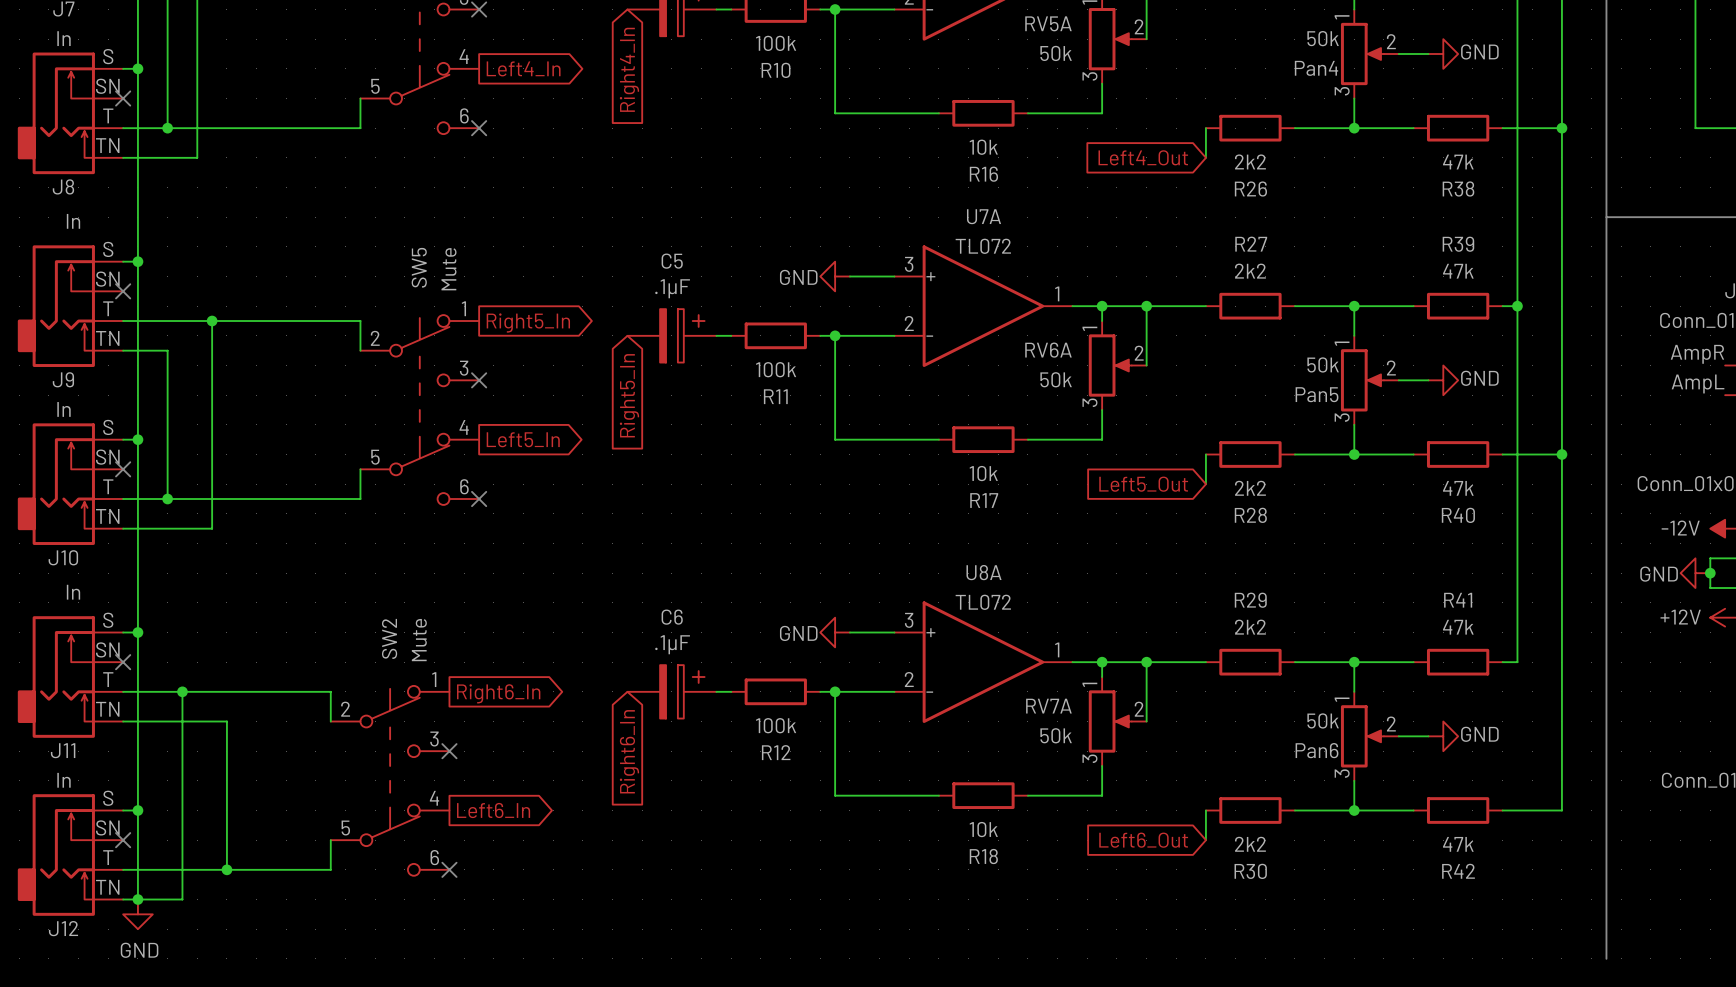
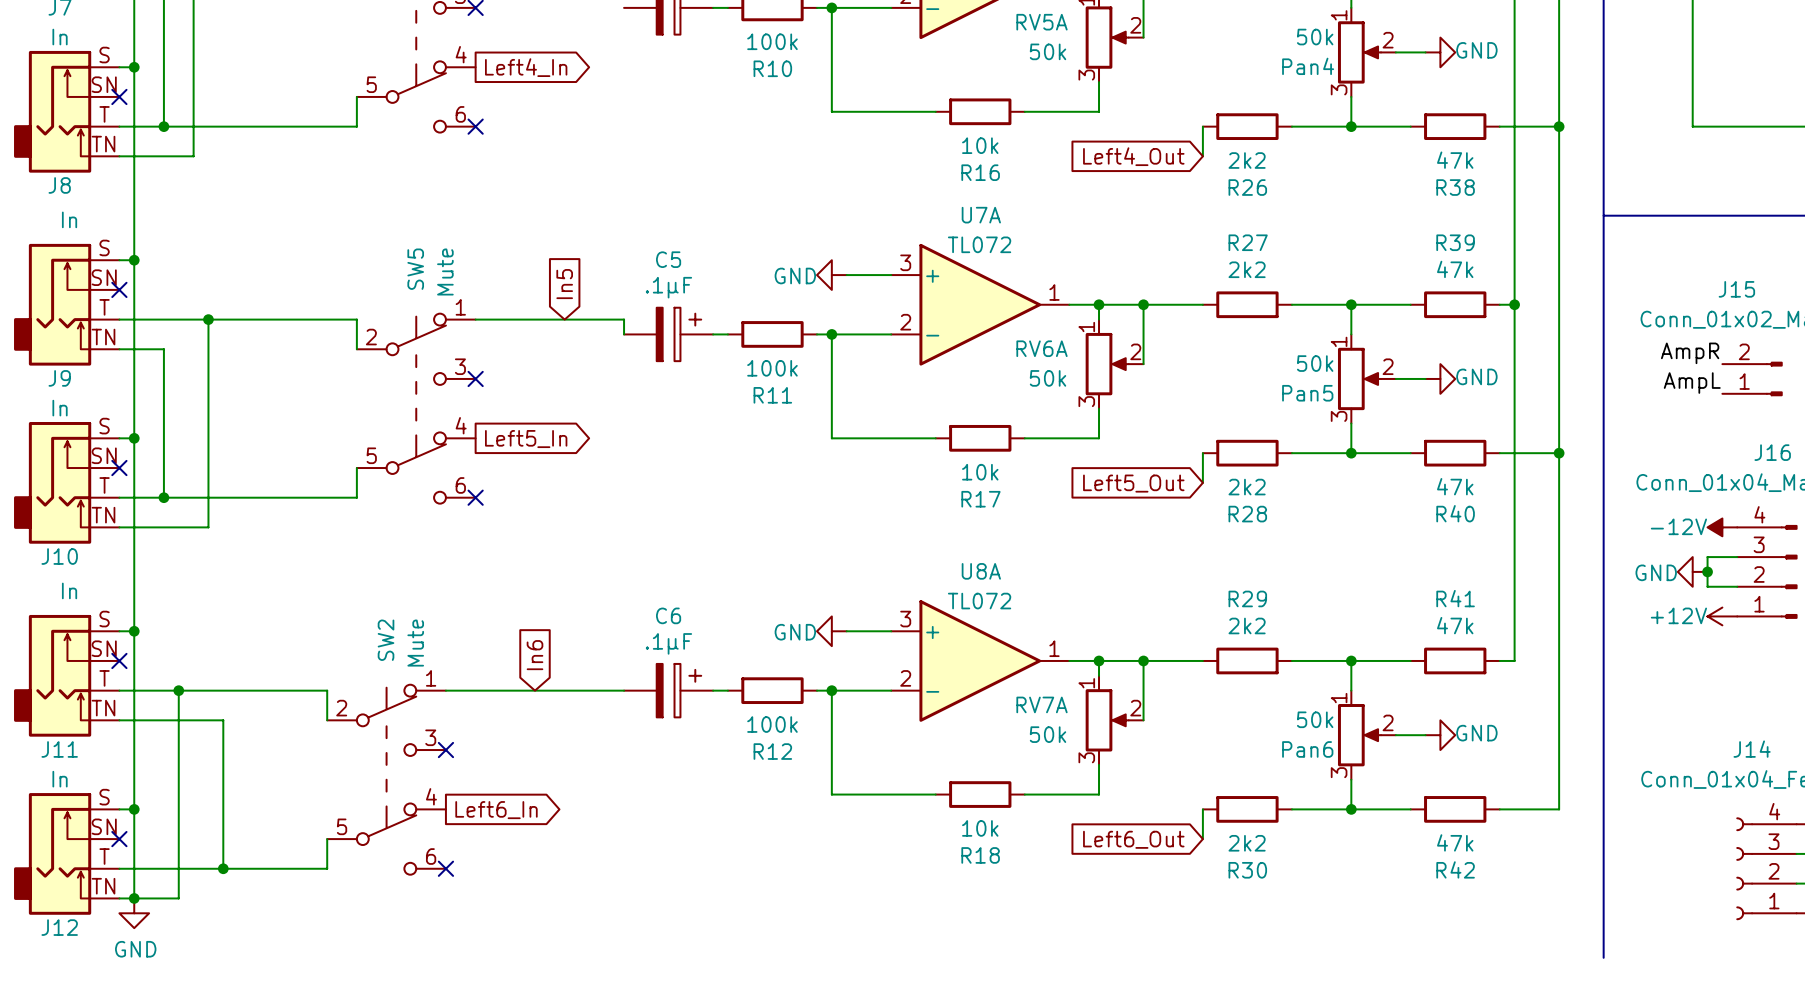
global label: Right4_In (629, 69) -> none
global label: none -> In5 (564, 284)
wire: none -> (475, 319) (624, 319) (624, 334)
global label: Right5_In (528, 323) -> none
global label: Right5_In (629, 395) -> none
global label: none -> In6 (534, 655)
wire: none -> (445, 690) (624, 690)
global label: Right6_In (498, 693) -> none
global label: Right6_In (629, 751) -> none

